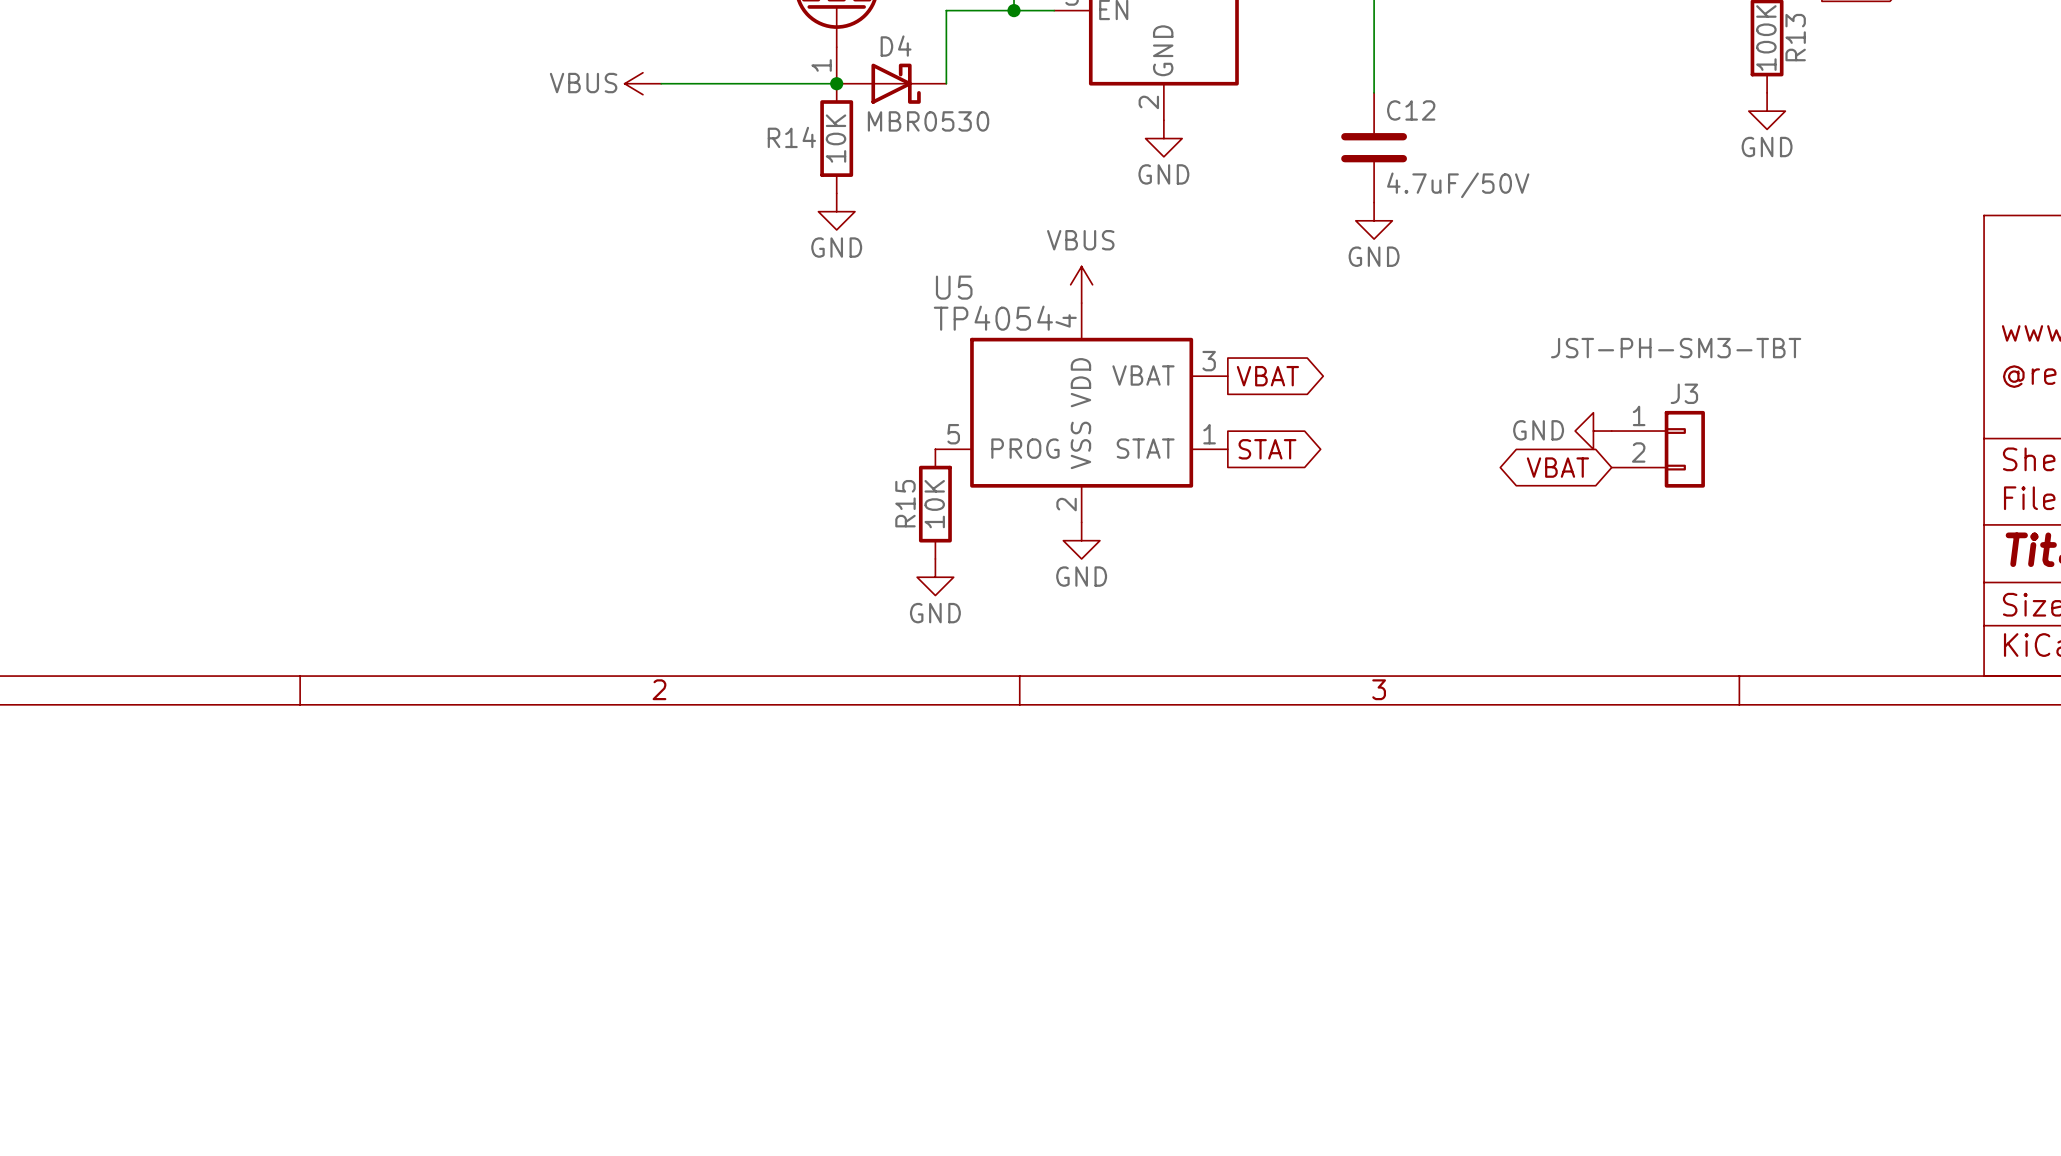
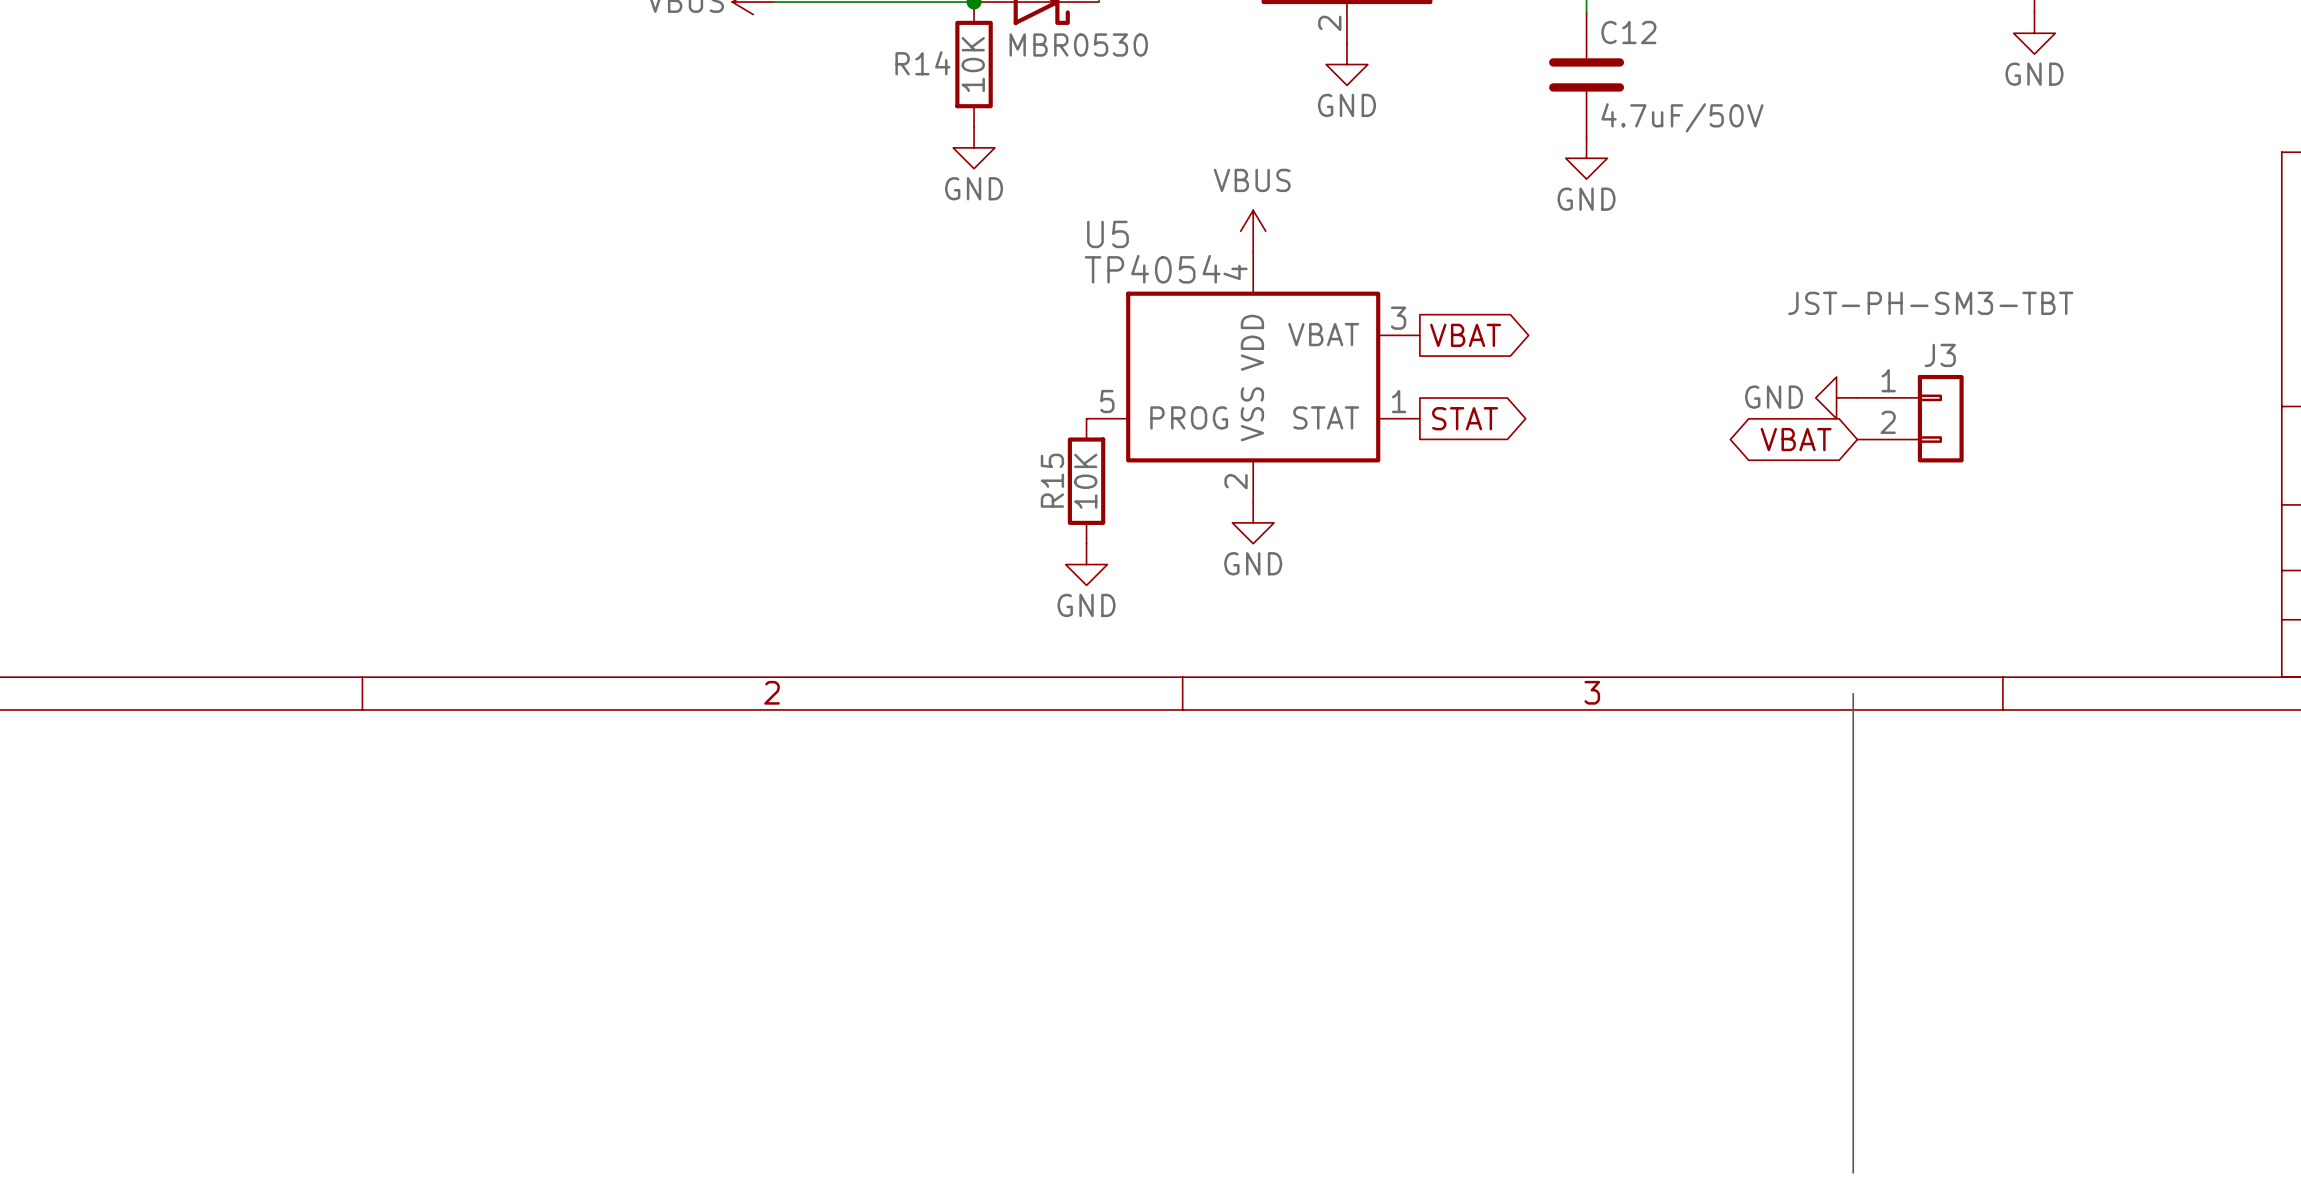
line: none -> (1853, 693) (1853, 1172)

